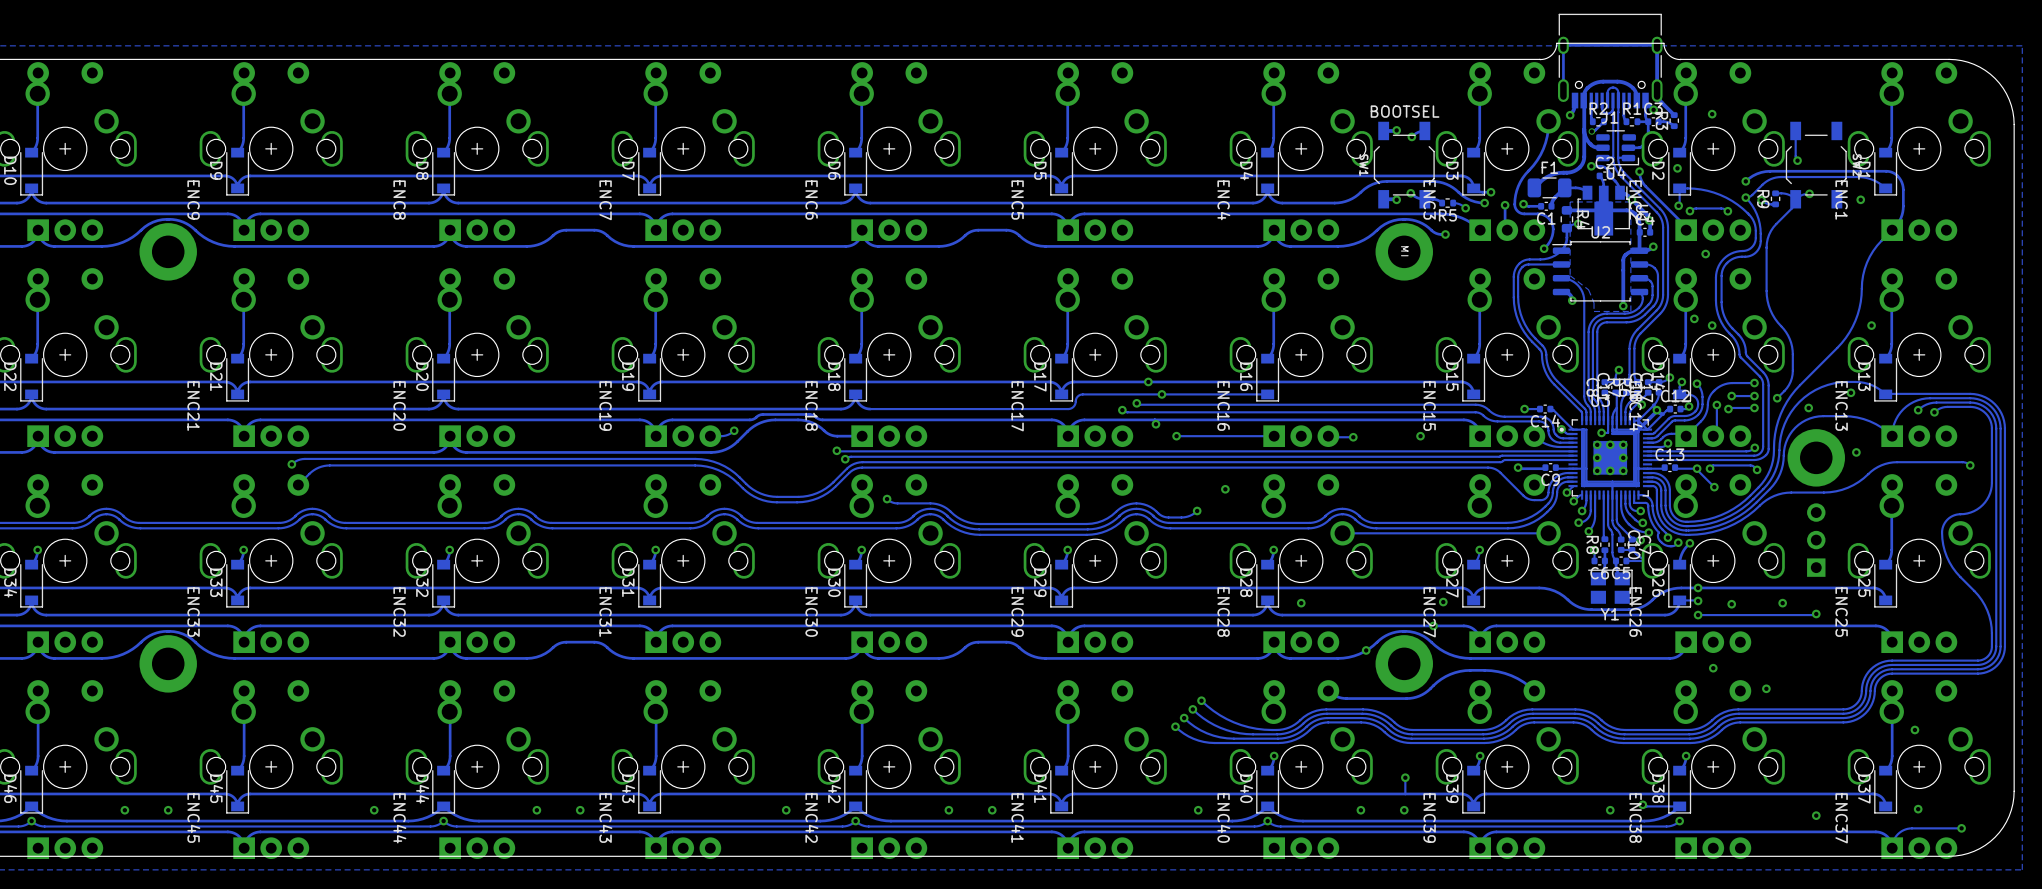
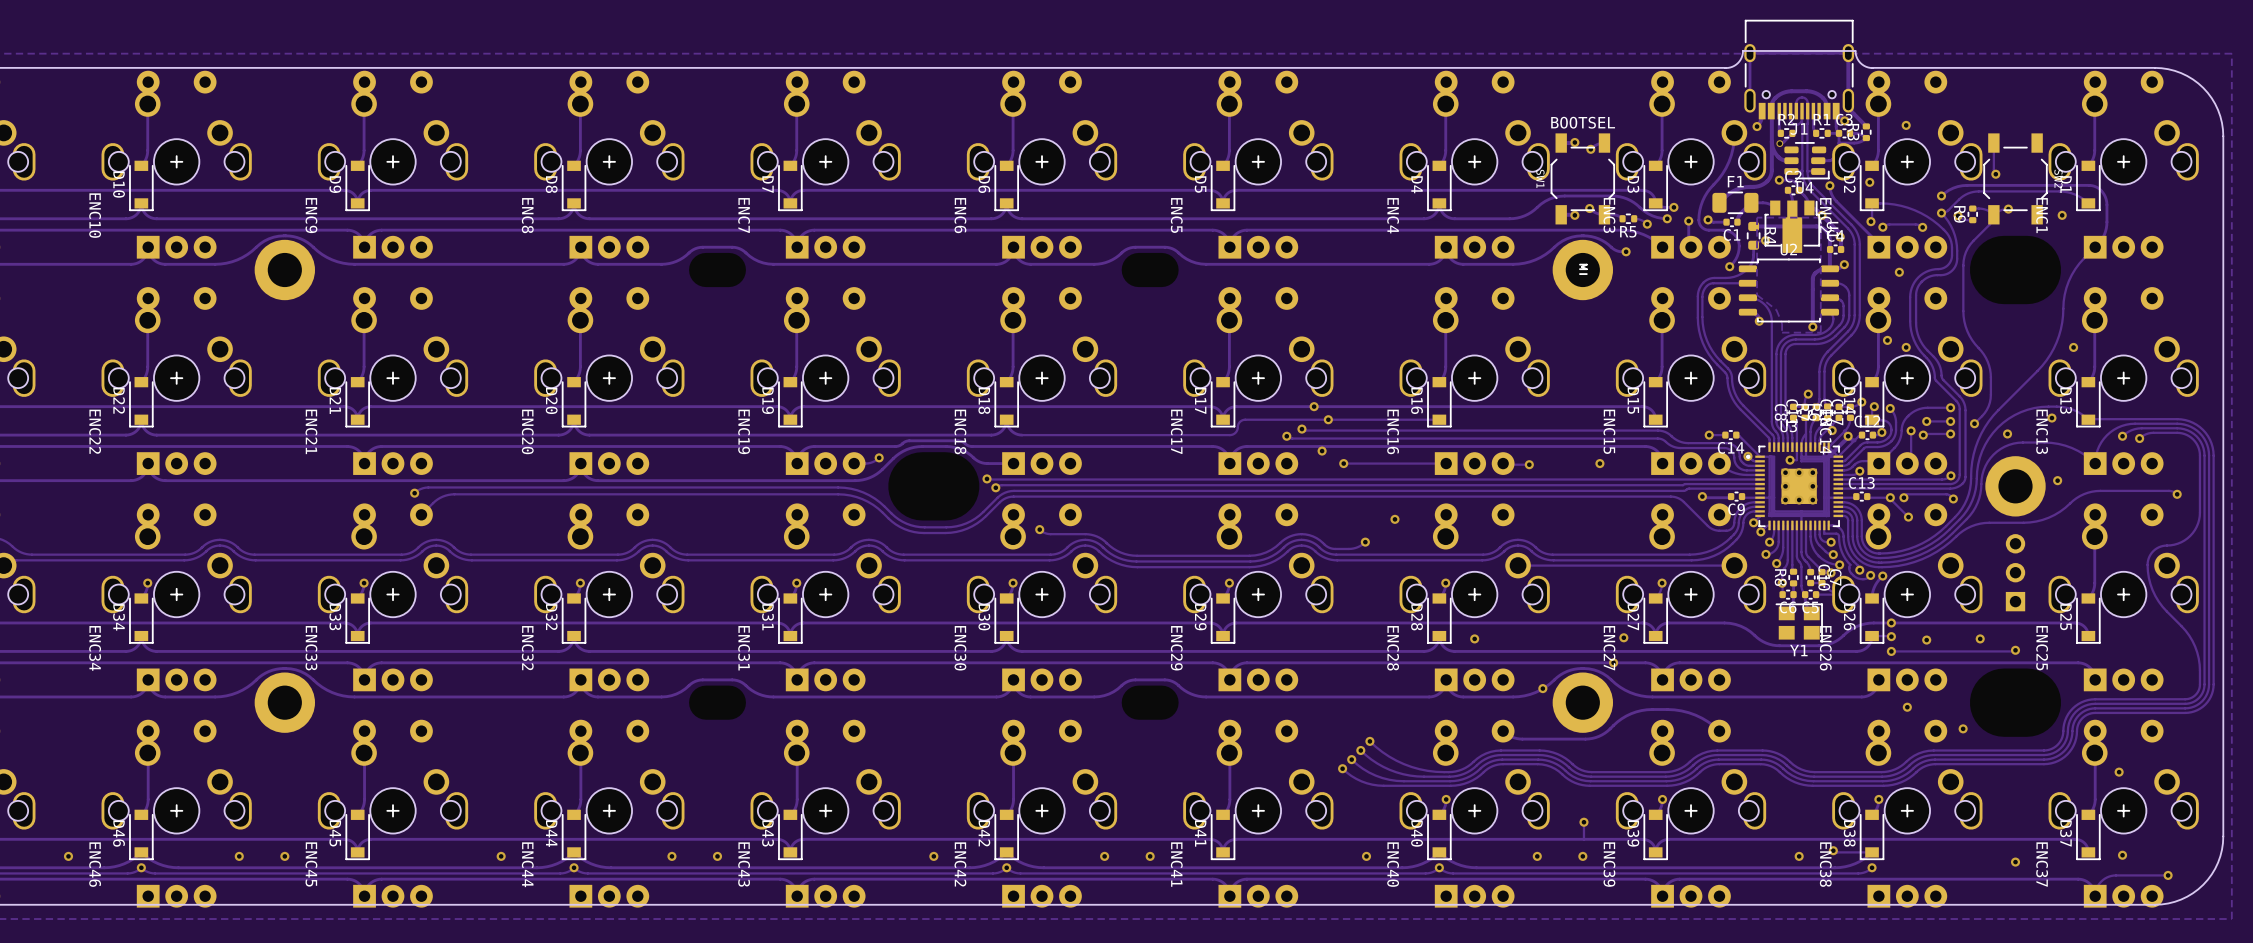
track: none -> (1866, 138) (1857, 142) (1839, 143)
track: none -> (1787, 525) (1787, 561) (1782, 571) (1782, 583)

